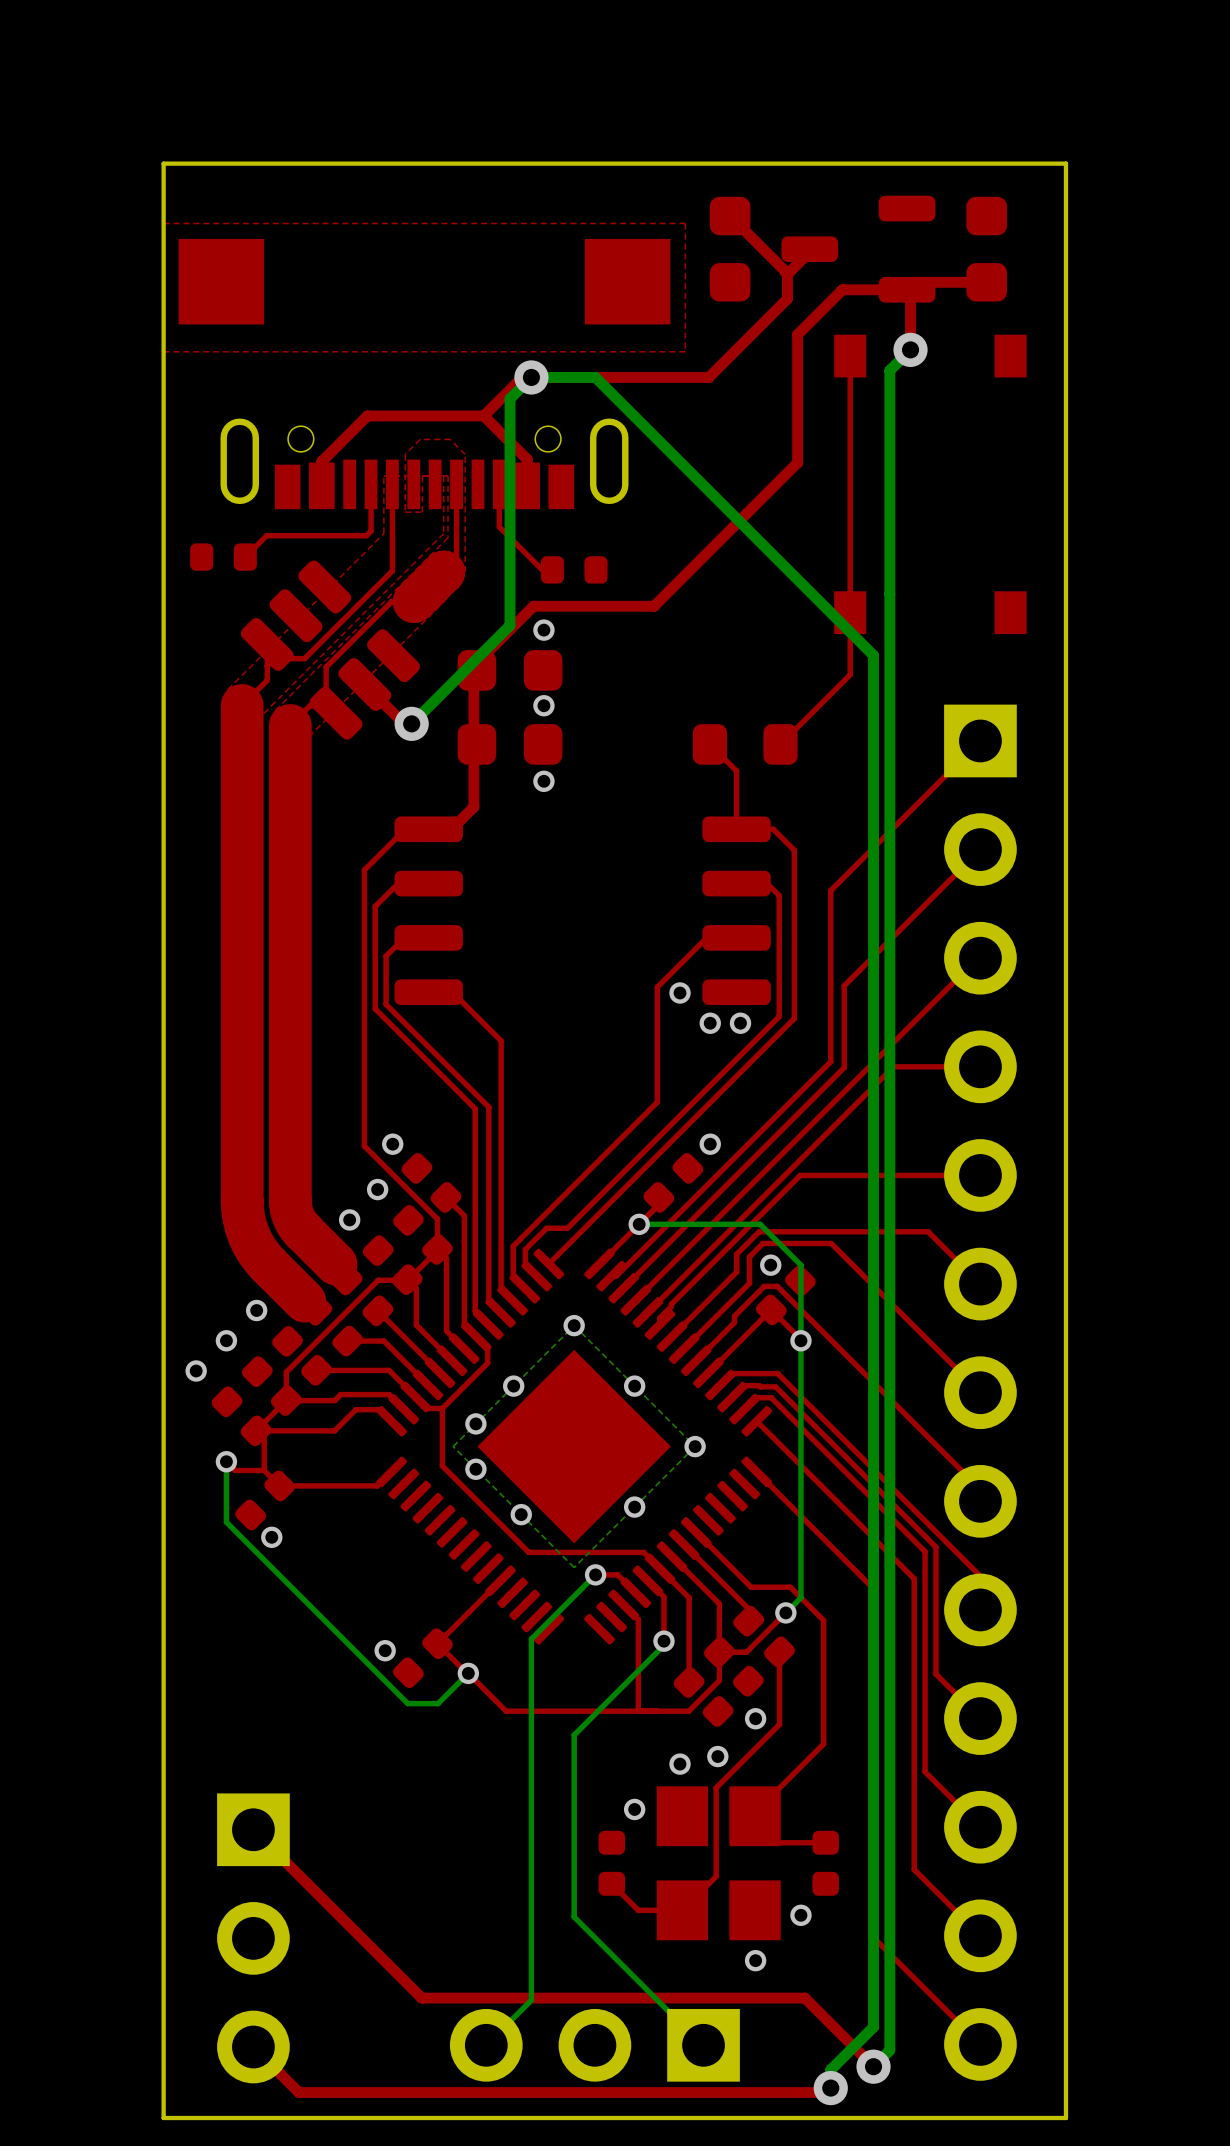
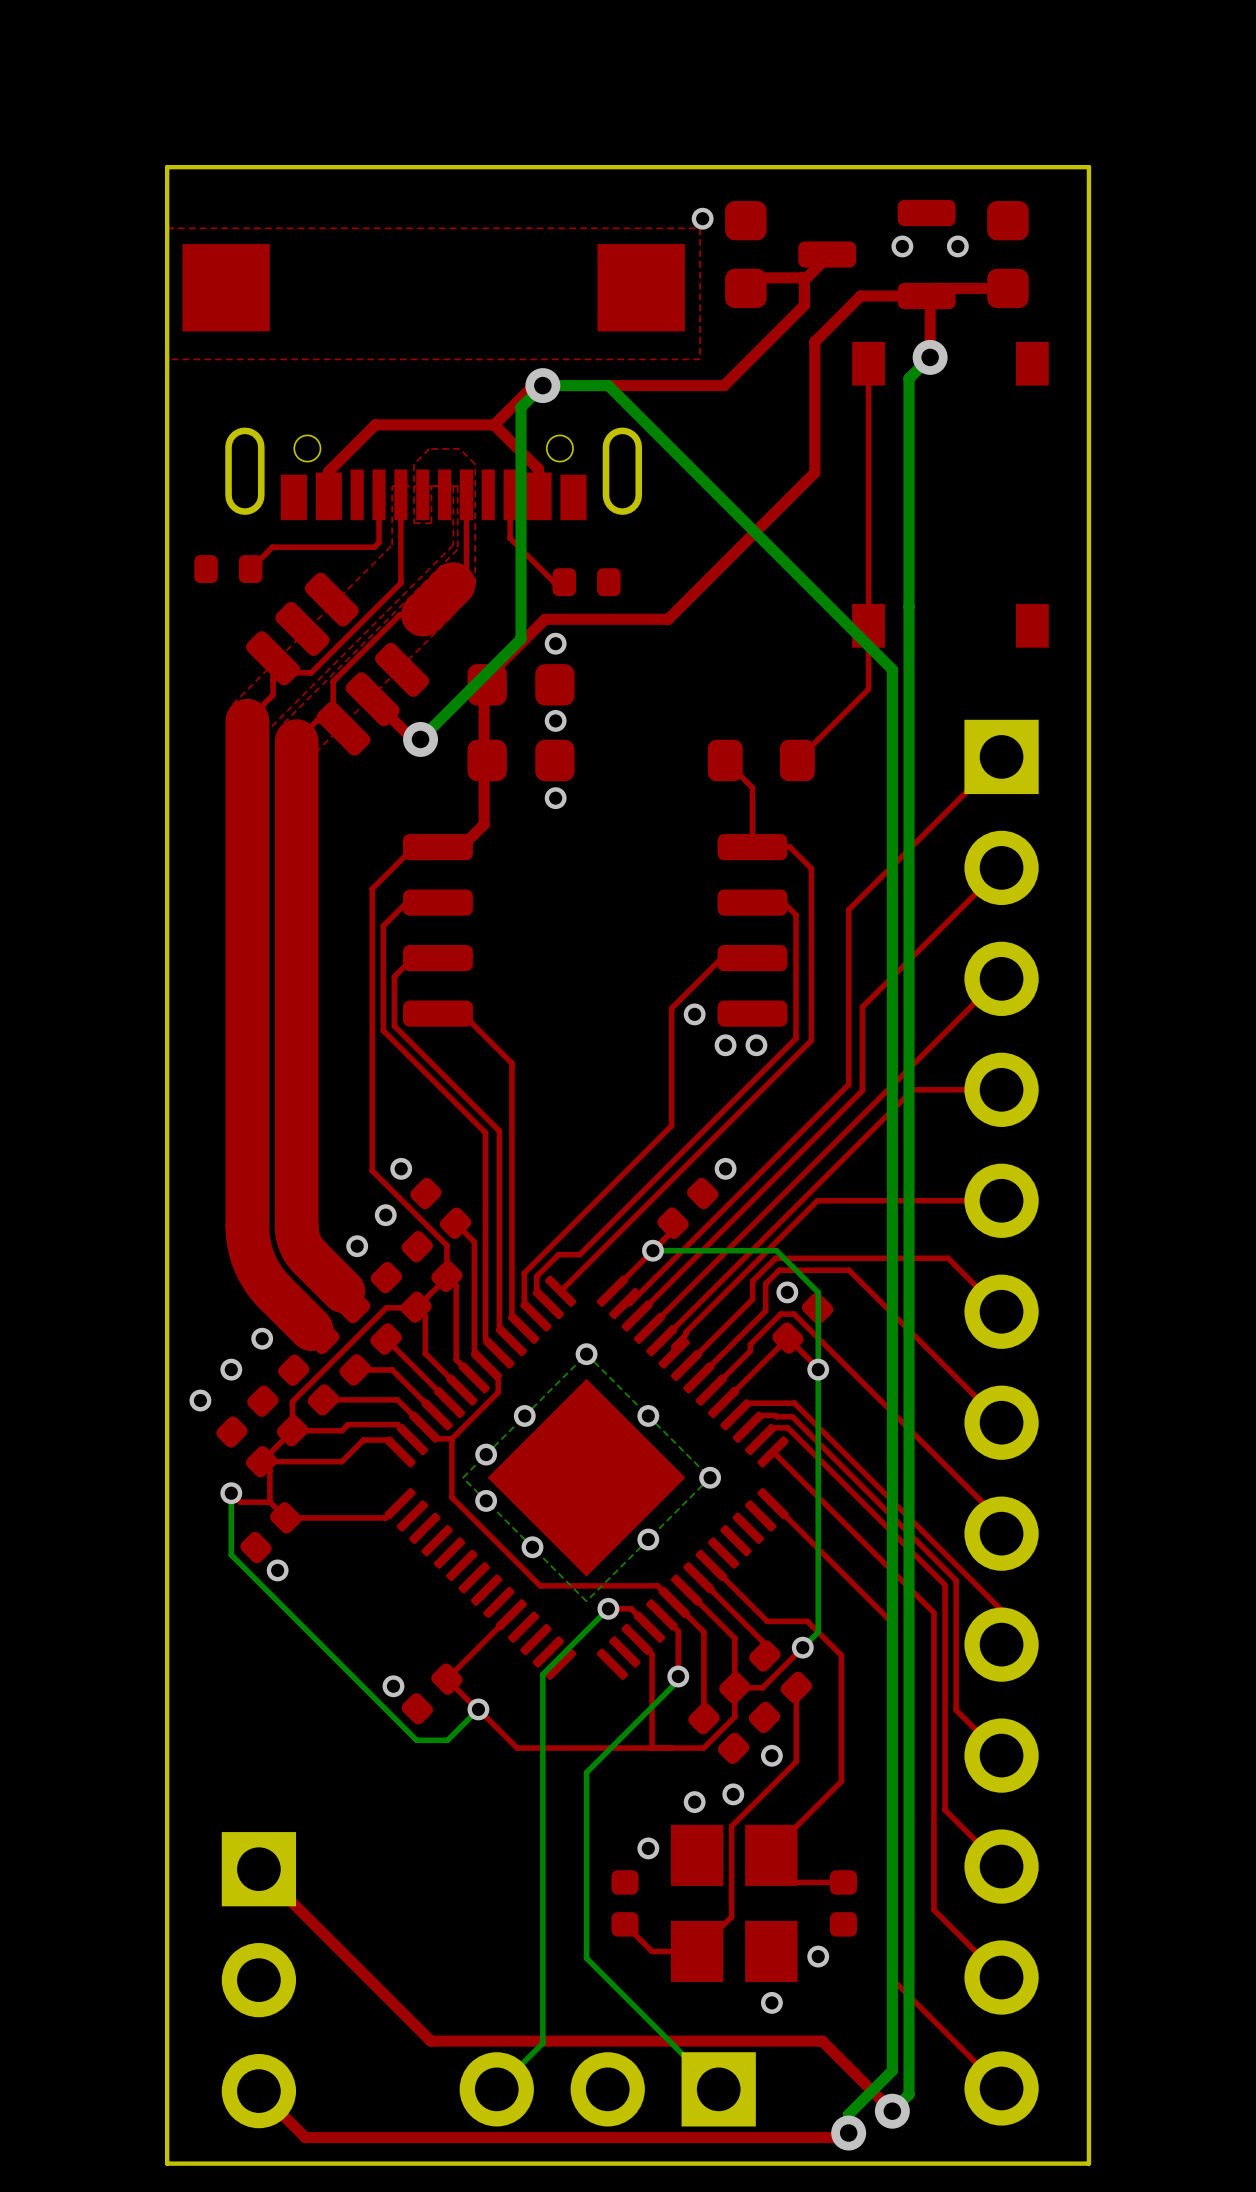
via: none -> (702, 218)
top track: (730, 216) (785, 271) -> (745, 288) (756, 277) (802, 277)
via: none -> (902, 246)
via: none -> (957, 246)

